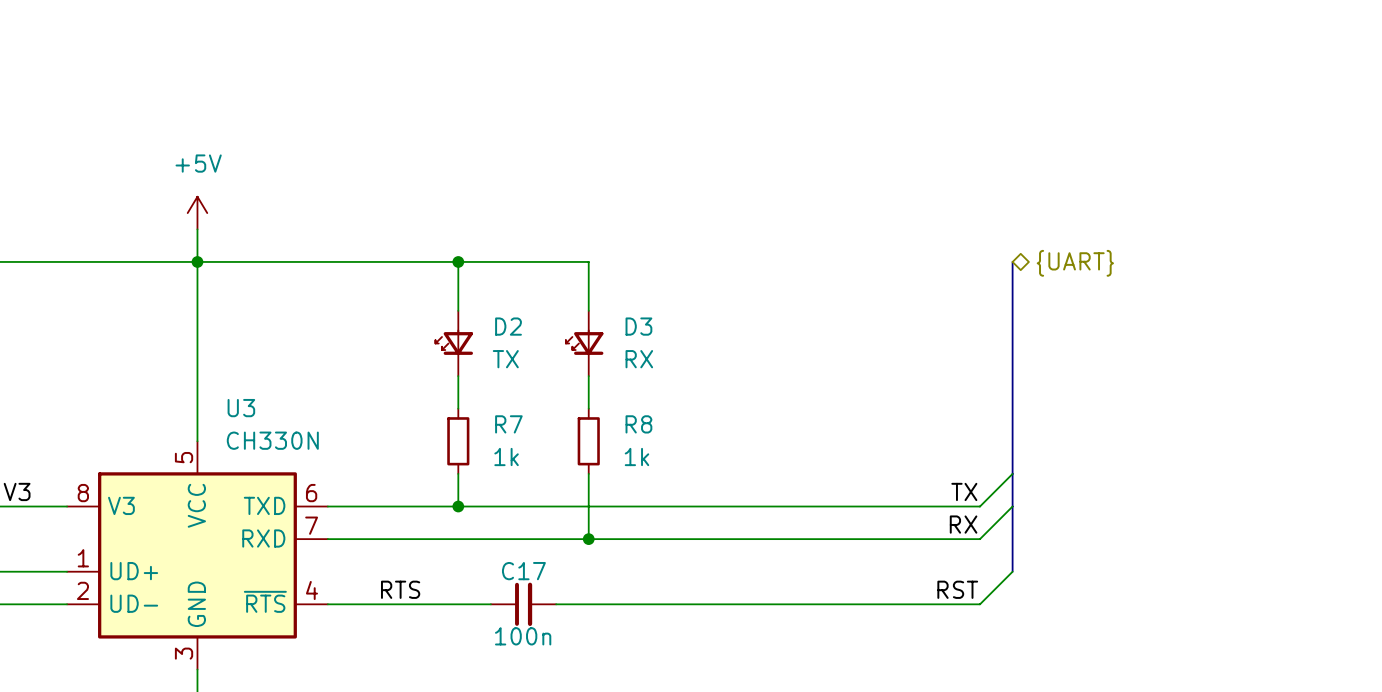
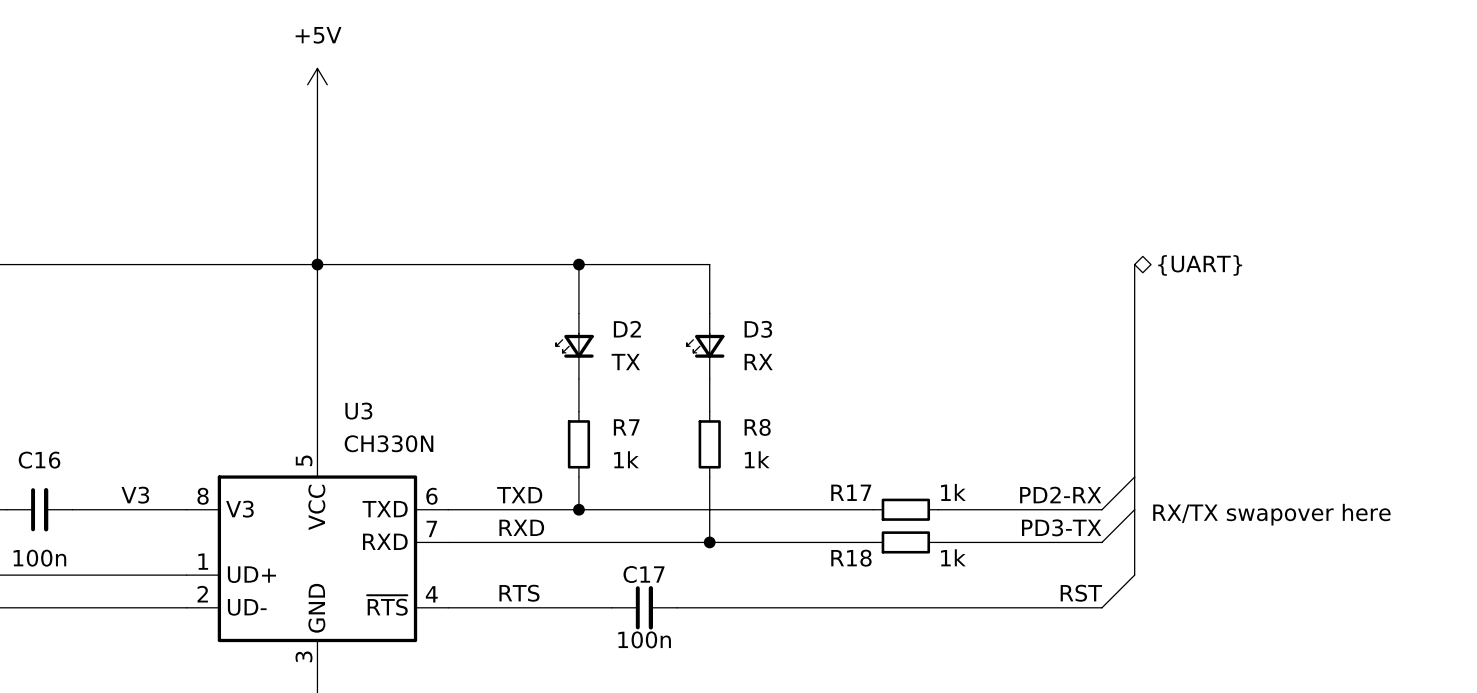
wire: none -> (317, 101) (317, 231)
power symbol position: +5V (197, 213) -> +5V (317, 84)
label: none -> TXD (519, 495)
label: TX (964, 491) -> PD2-RX (1060, 495)
wire: (751, 506) (816, 506) -> none
R17: none -> 1k (905, 509)
text: none -> RX/TX swapover here (1271, 514)
label: none -> RXD (521, 527)
label: RX (963, 524) -> PD3-TX (1061, 527)
wire: (751, 539) (816, 539) -> none
R18: none -> 1k (905, 542)

